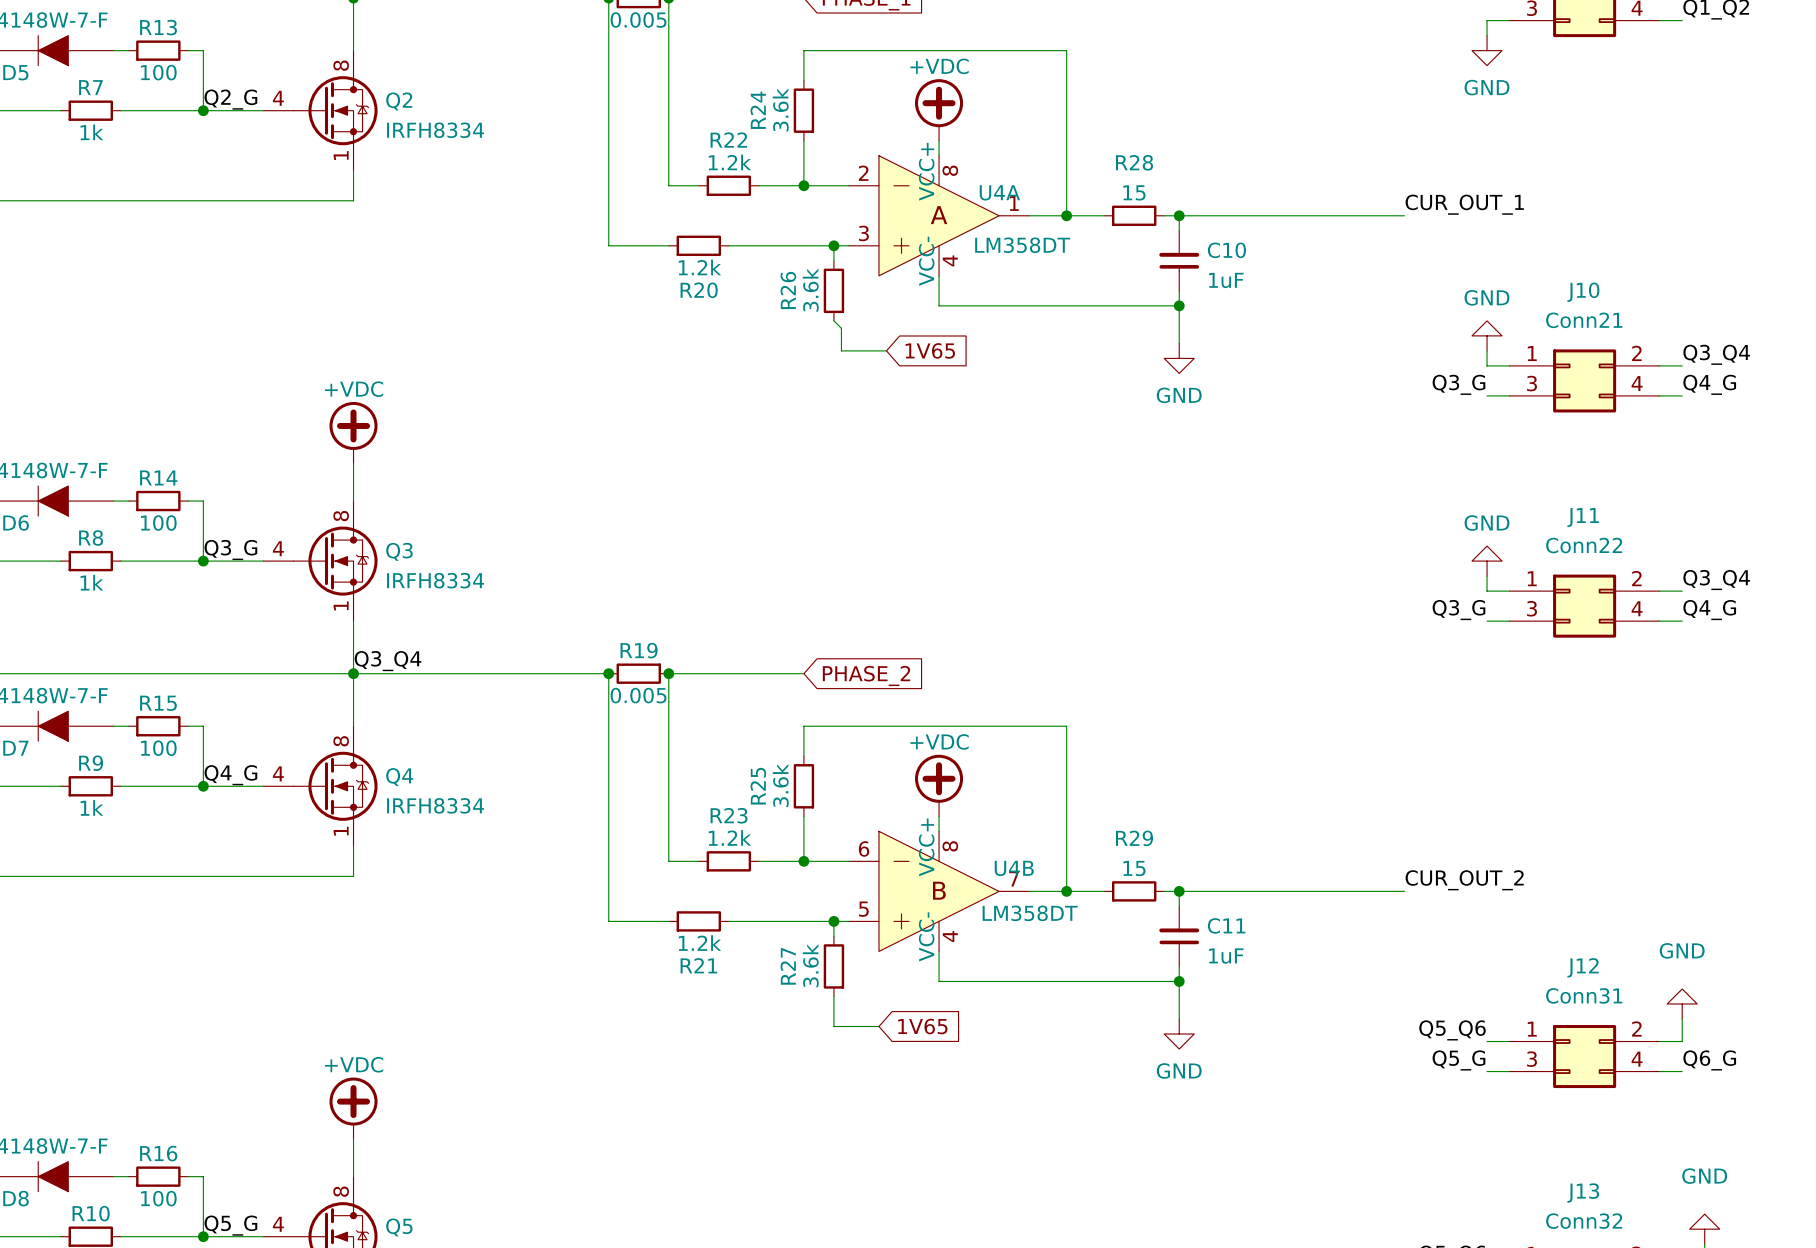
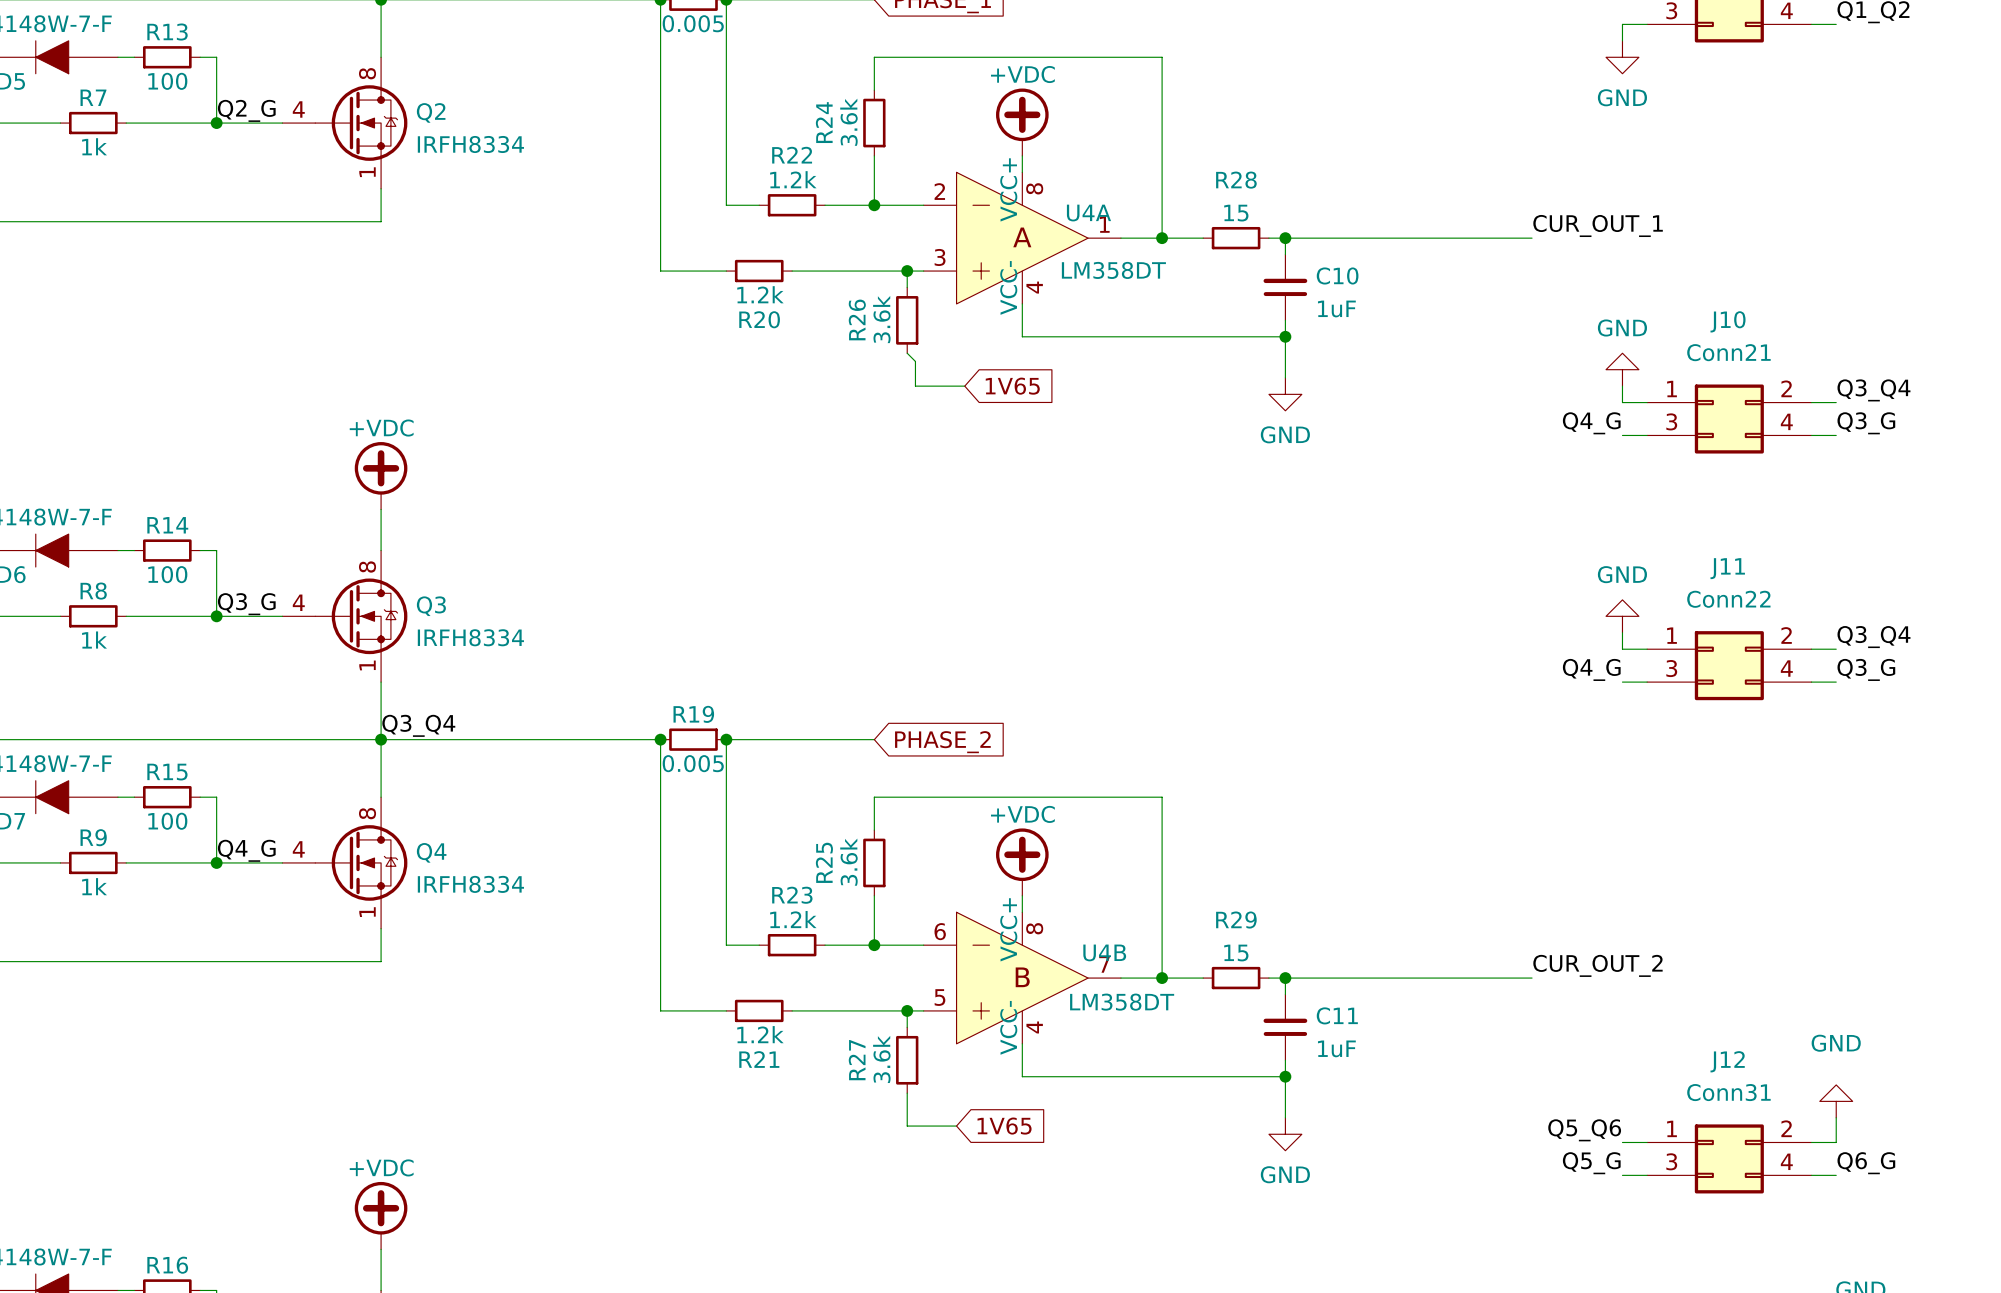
label: Q3_G (1458, 384) -> Q4_G (1591, 423)
label: Q4_G (1709, 384) -> Q3_G (1866, 423)
label: Q3_G (1458, 610) -> Q4_G (1591, 669)
label: Q4_G (1709, 610) -> Q3_G (1866, 669)

